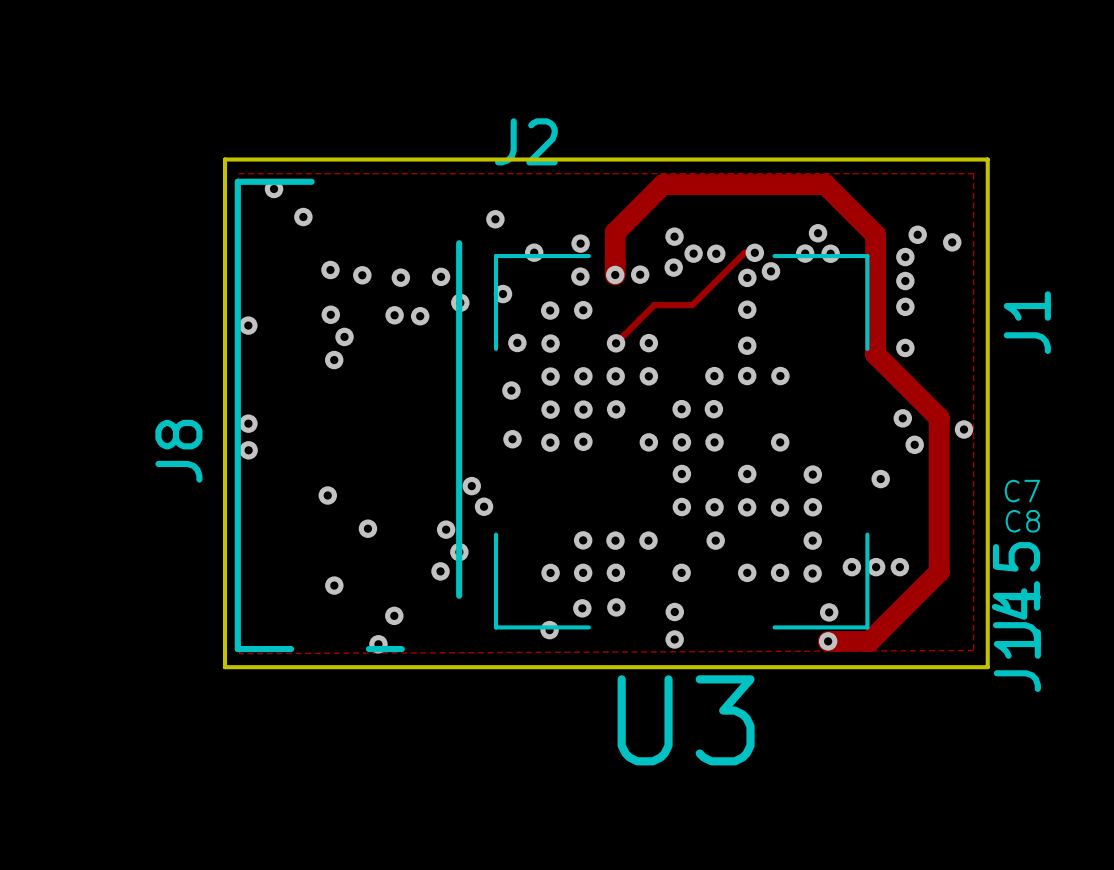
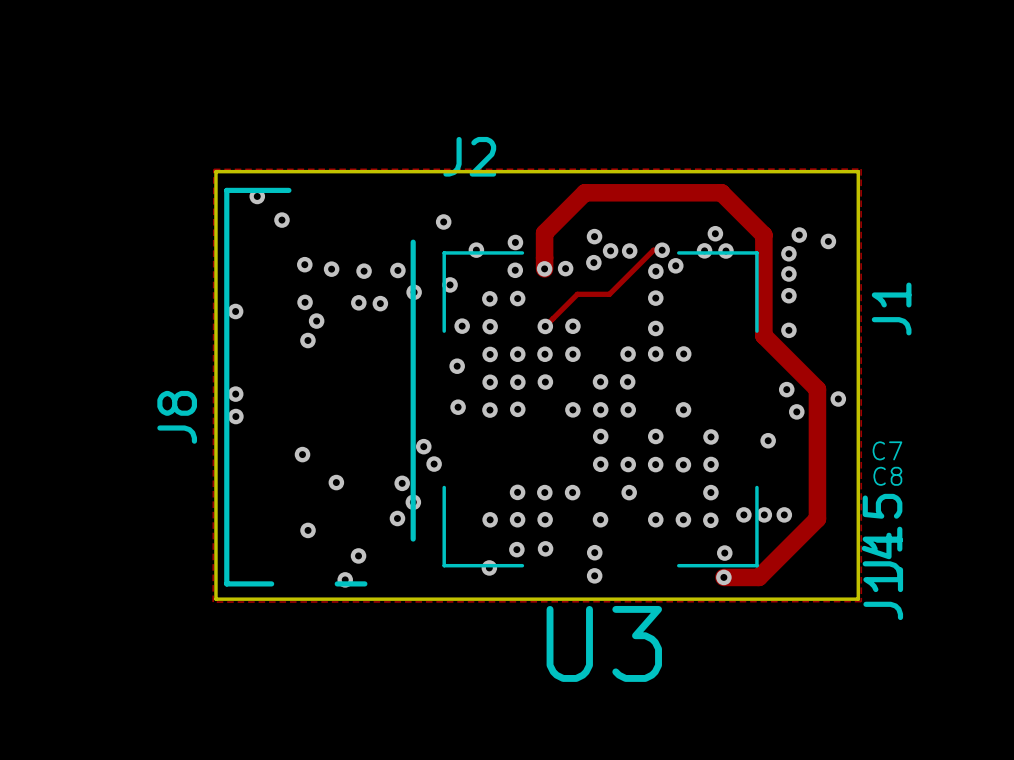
zone outline: (238, 173) (973, 173) (973, 650) (239, 653) (238, 173) -> (861, 169) (213, 169) (213, 602) (861, 601) (861, 169)

